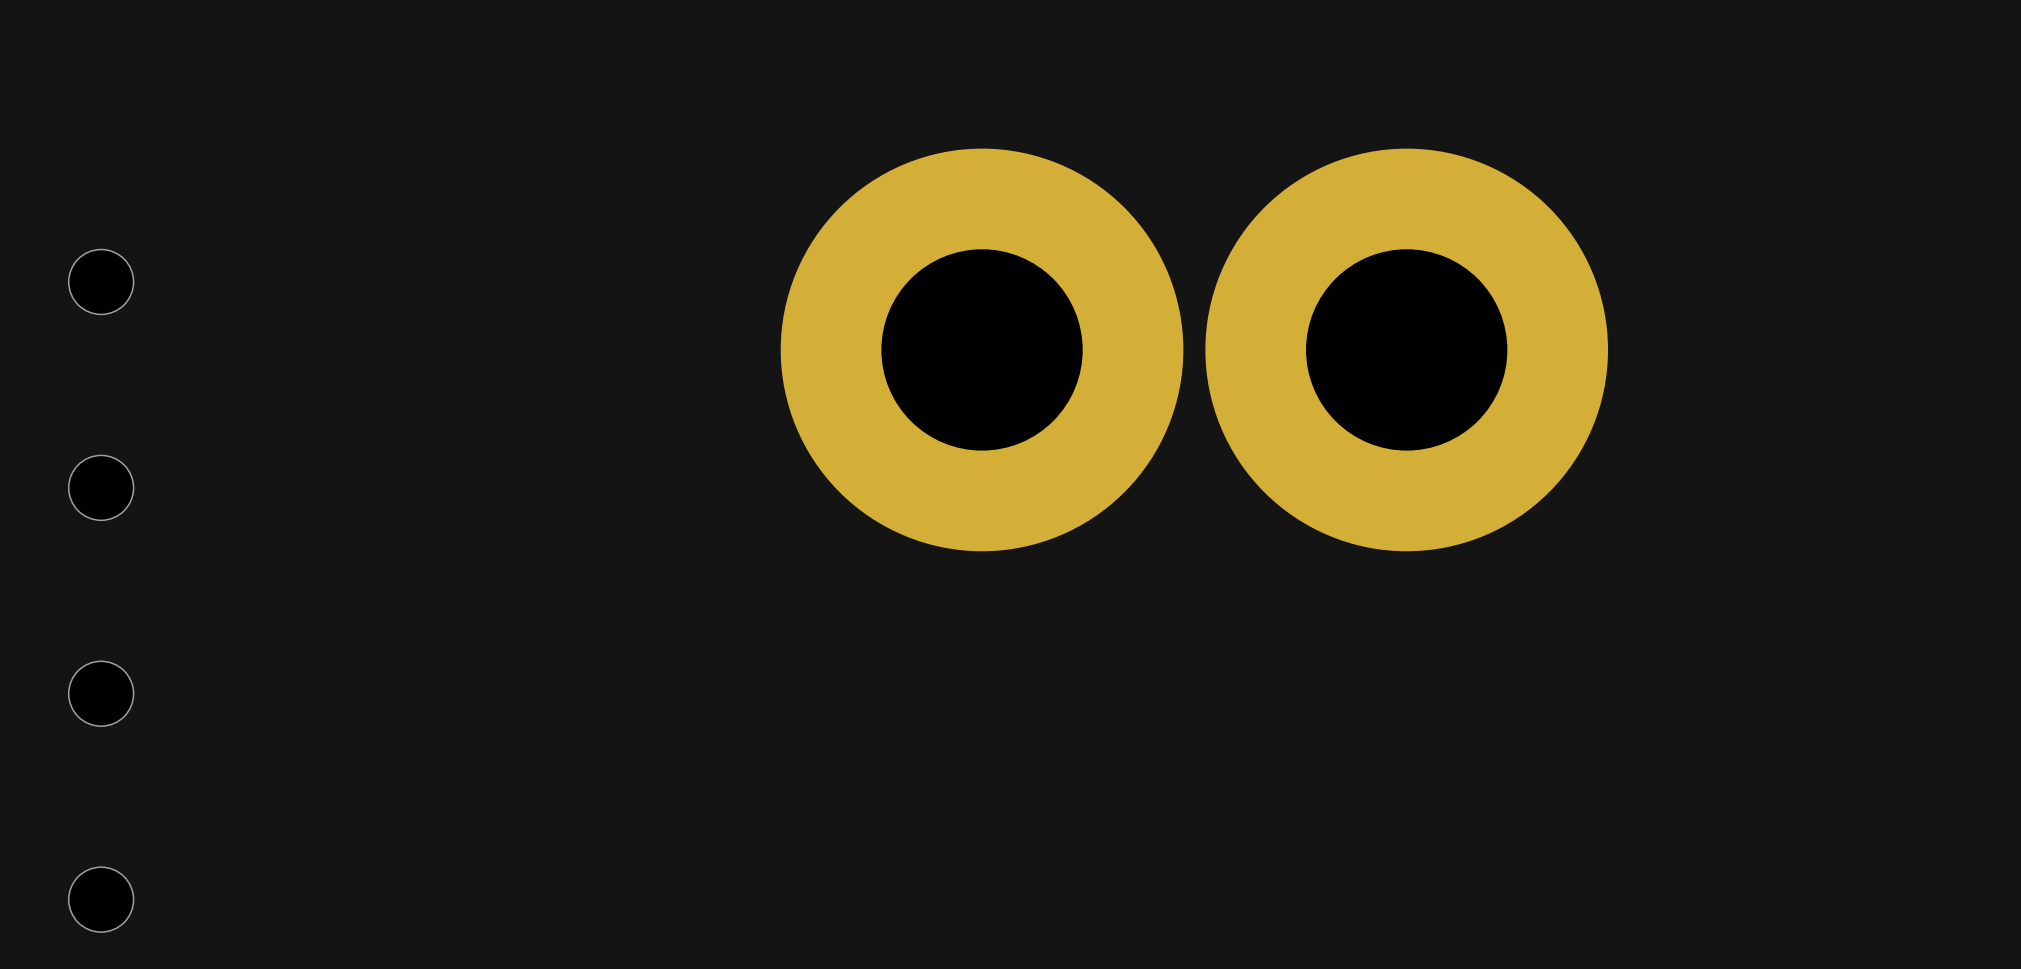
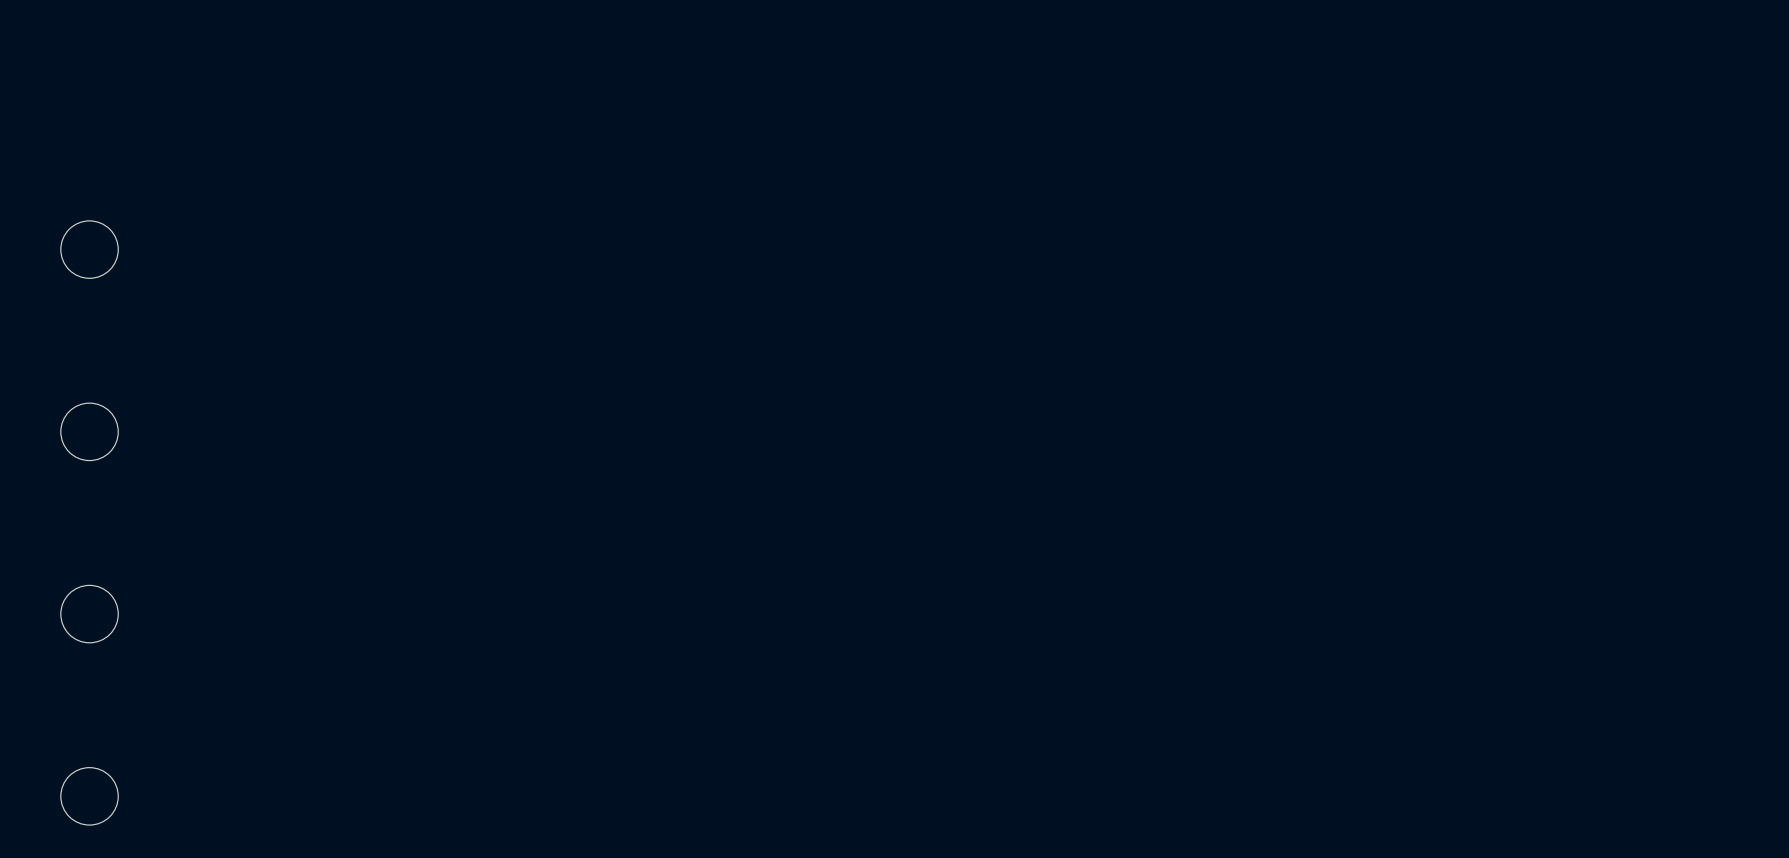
part: (982, 349) -> none
part: (1406, 349) -> none

